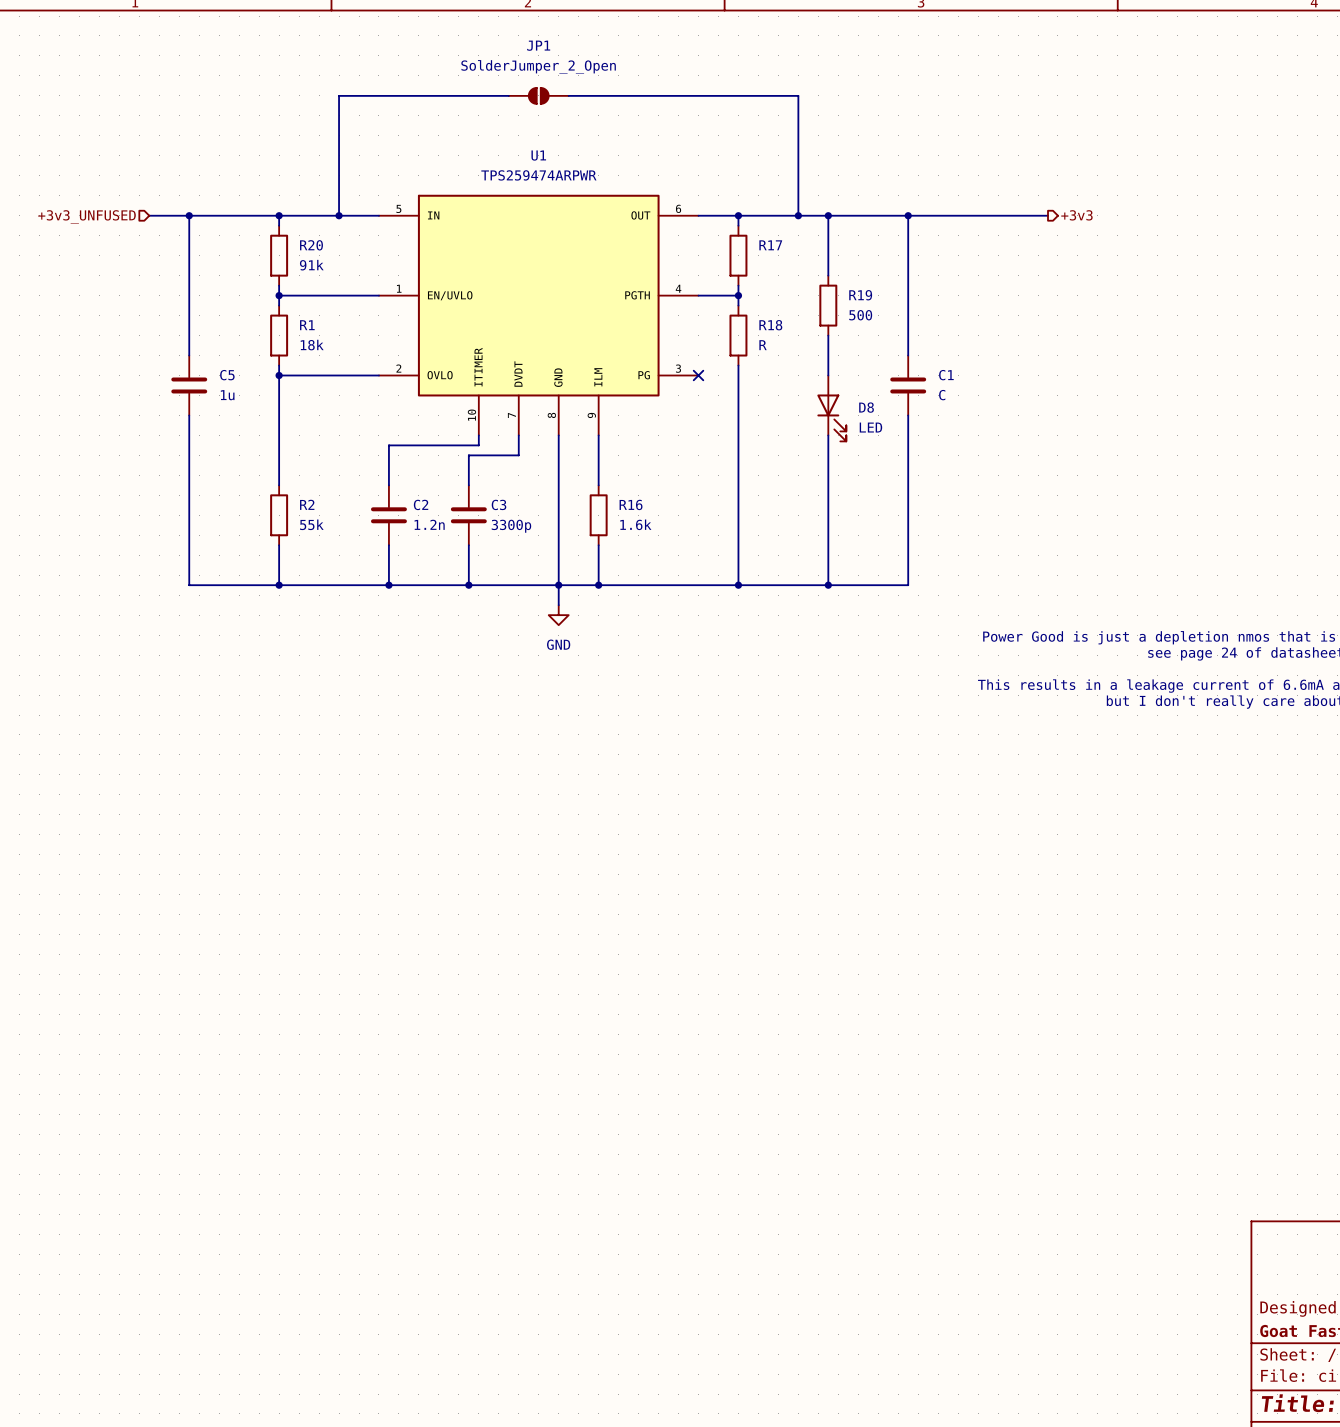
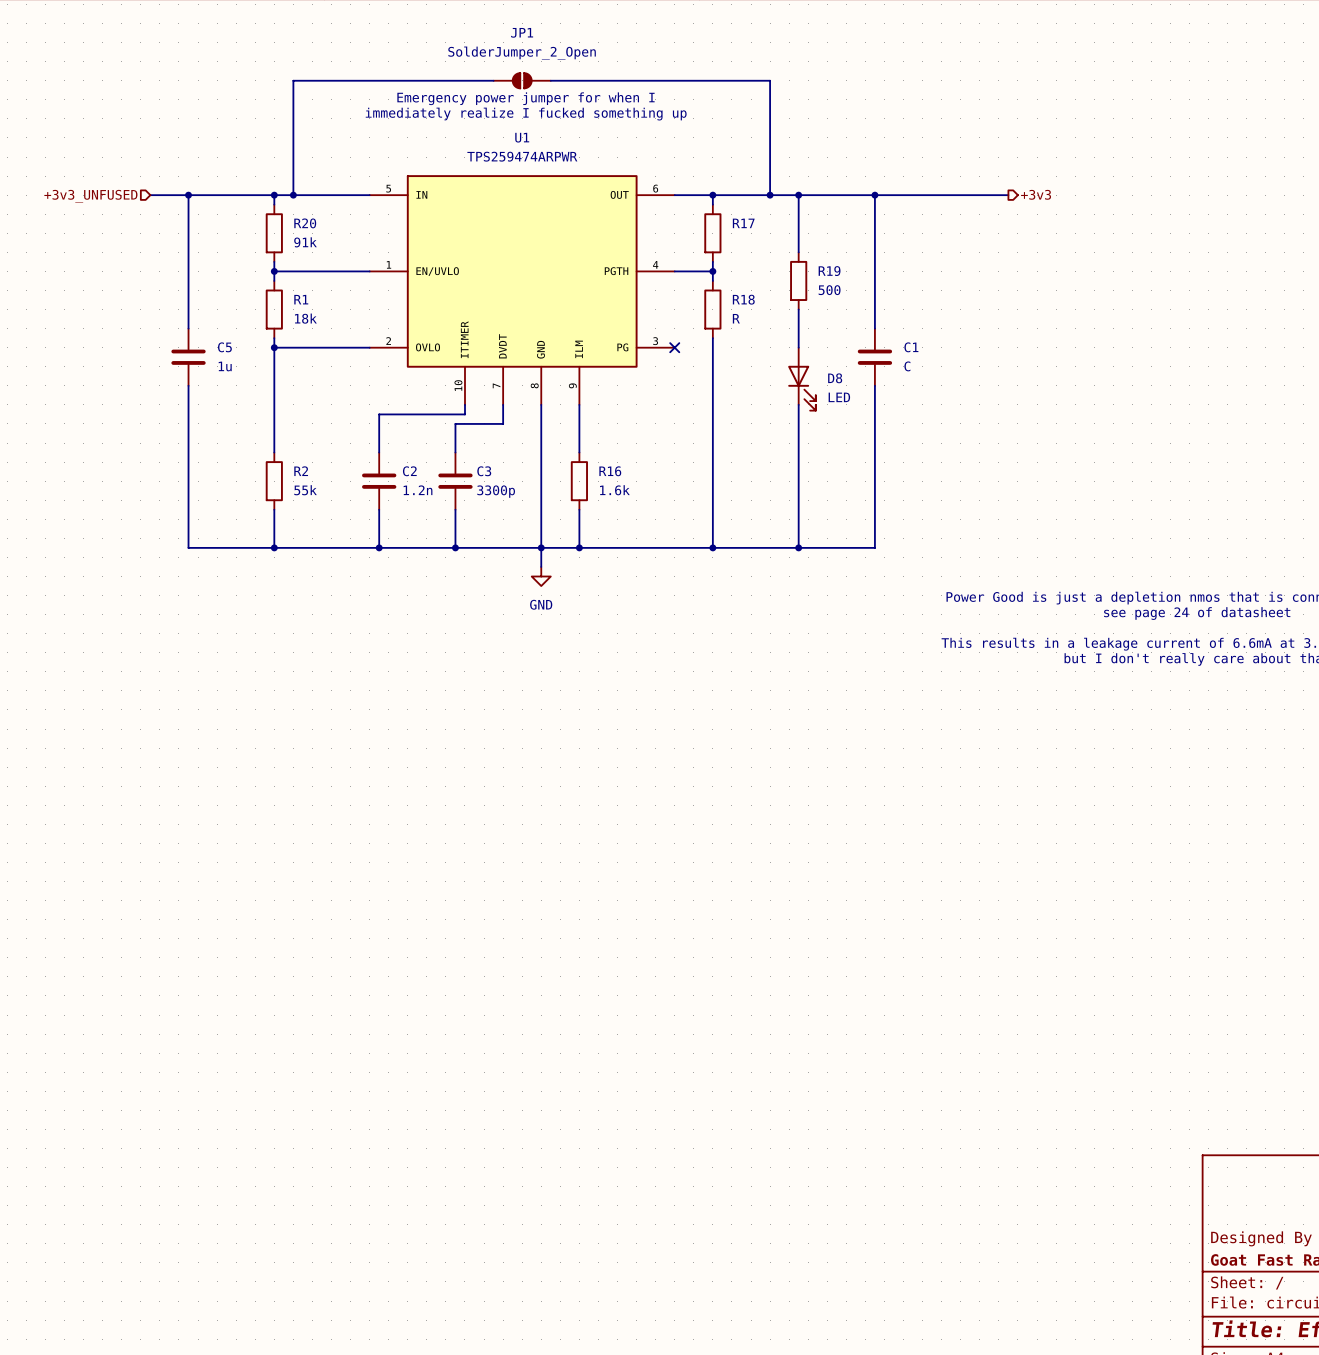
wire: (339, 95) (339, 215) -> (331, 80) (293, 80) (293, 195)
text: none -> Emergency power jumper for when I (525, 98)
text: none -> immediately realize I fucked something up (526, 114)
junction position: (339, 215) -> (293, 195)

